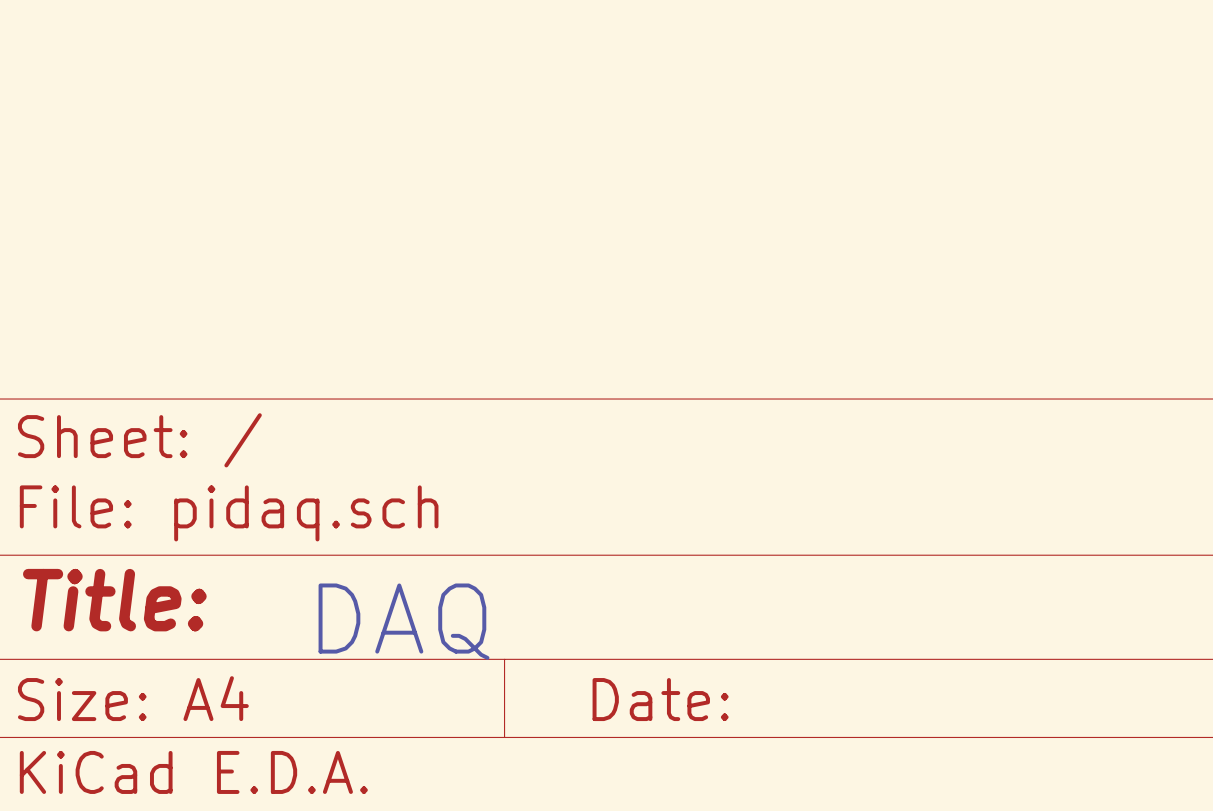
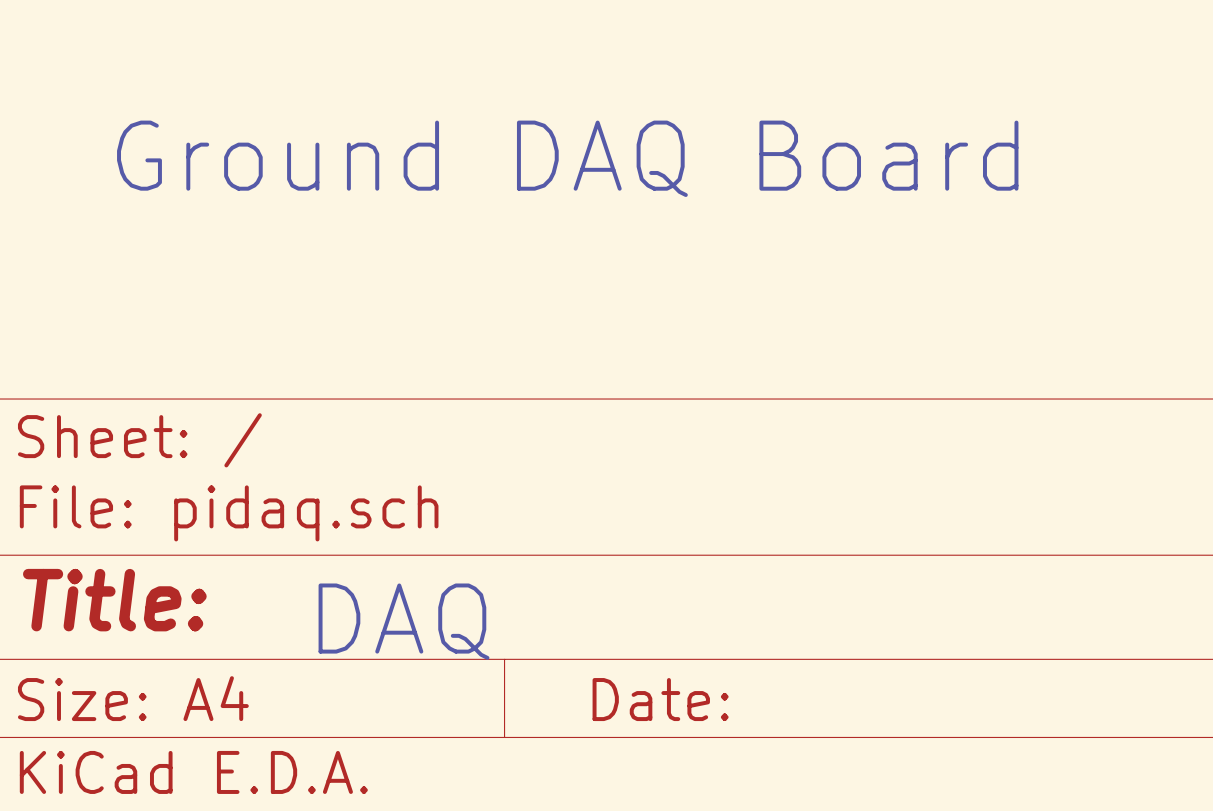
text: none -> Ground DAQ Board (567, 158)

